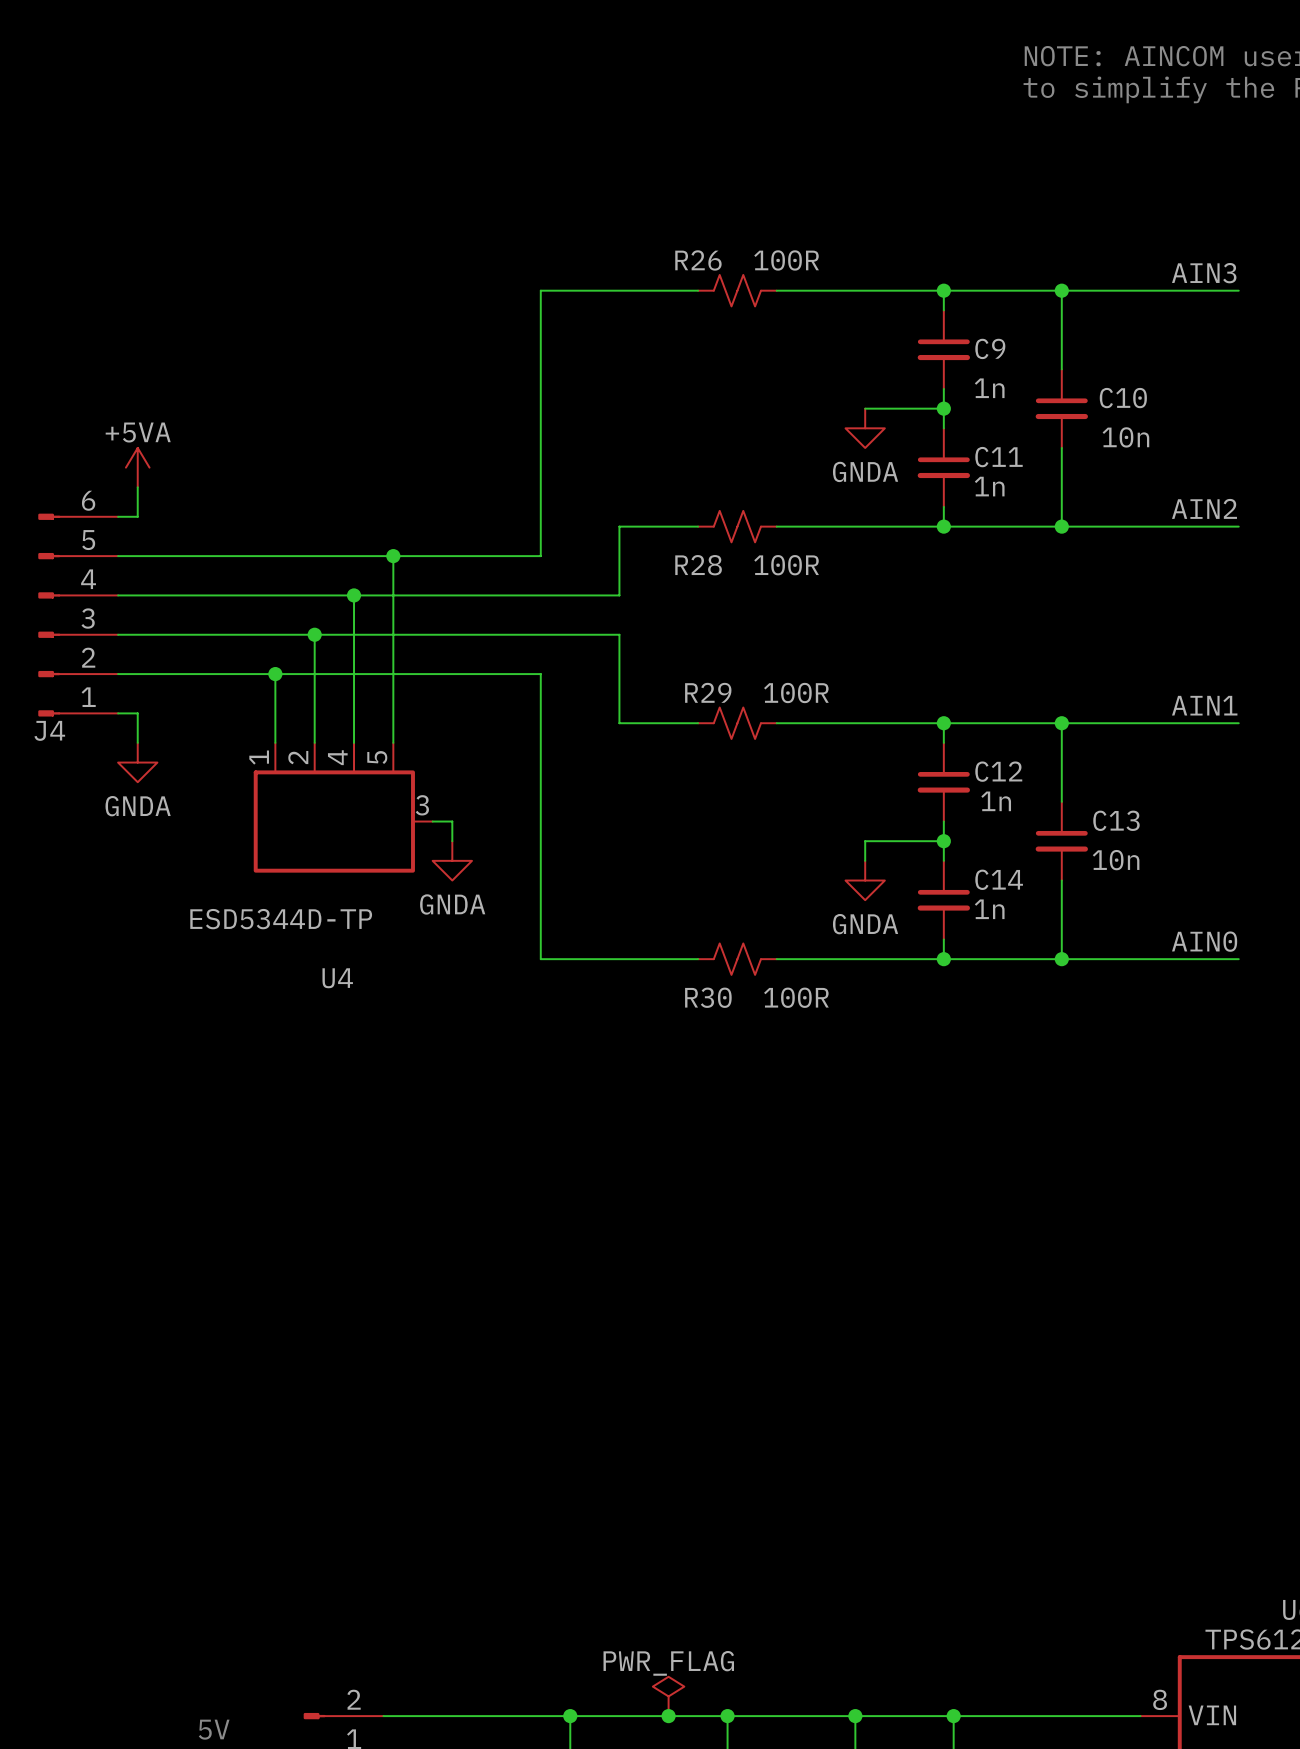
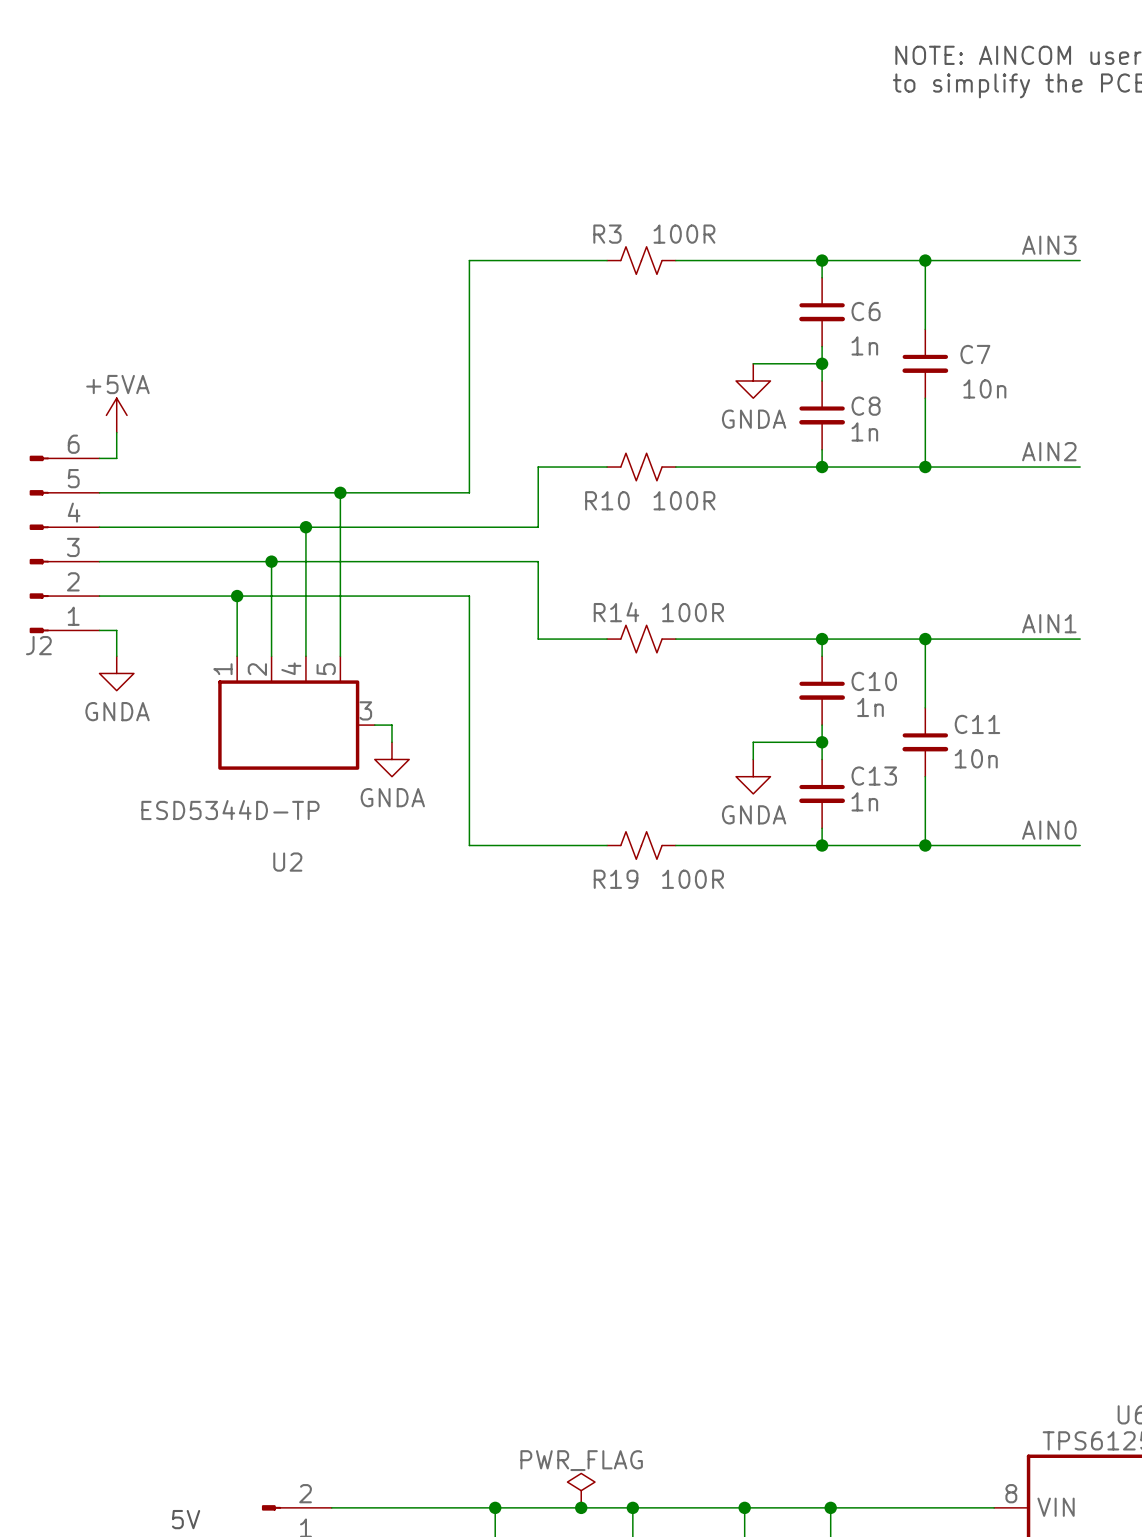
R26 name: R26 (698, 260) -> R3 (607, 234)
C9 name: C9 (990, 348) -> C6 (866, 311)
C10 name: C10 (1123, 398) -> C7 (975, 354)
C11 name: C11 (999, 457) -> C8 (866, 406)
R28 name: R28 (698, 565) -> R10 (607, 500)
R29 name: R29 (708, 692) -> R14 (616, 612)
J4 name: J4 (49, 730) -> J2 (38, 645)
C12 name: C12 (998, 771) -> C10 (874, 681)
C13 name: C13 (1116, 820) -> C11 (977, 724)
C14 name: C14 (999, 879) -> C13 (874, 776)
U4 name: U4 (337, 978) -> U2 (287, 862)
R30 name: R30 (708, 997) -> R19 (616, 879)

